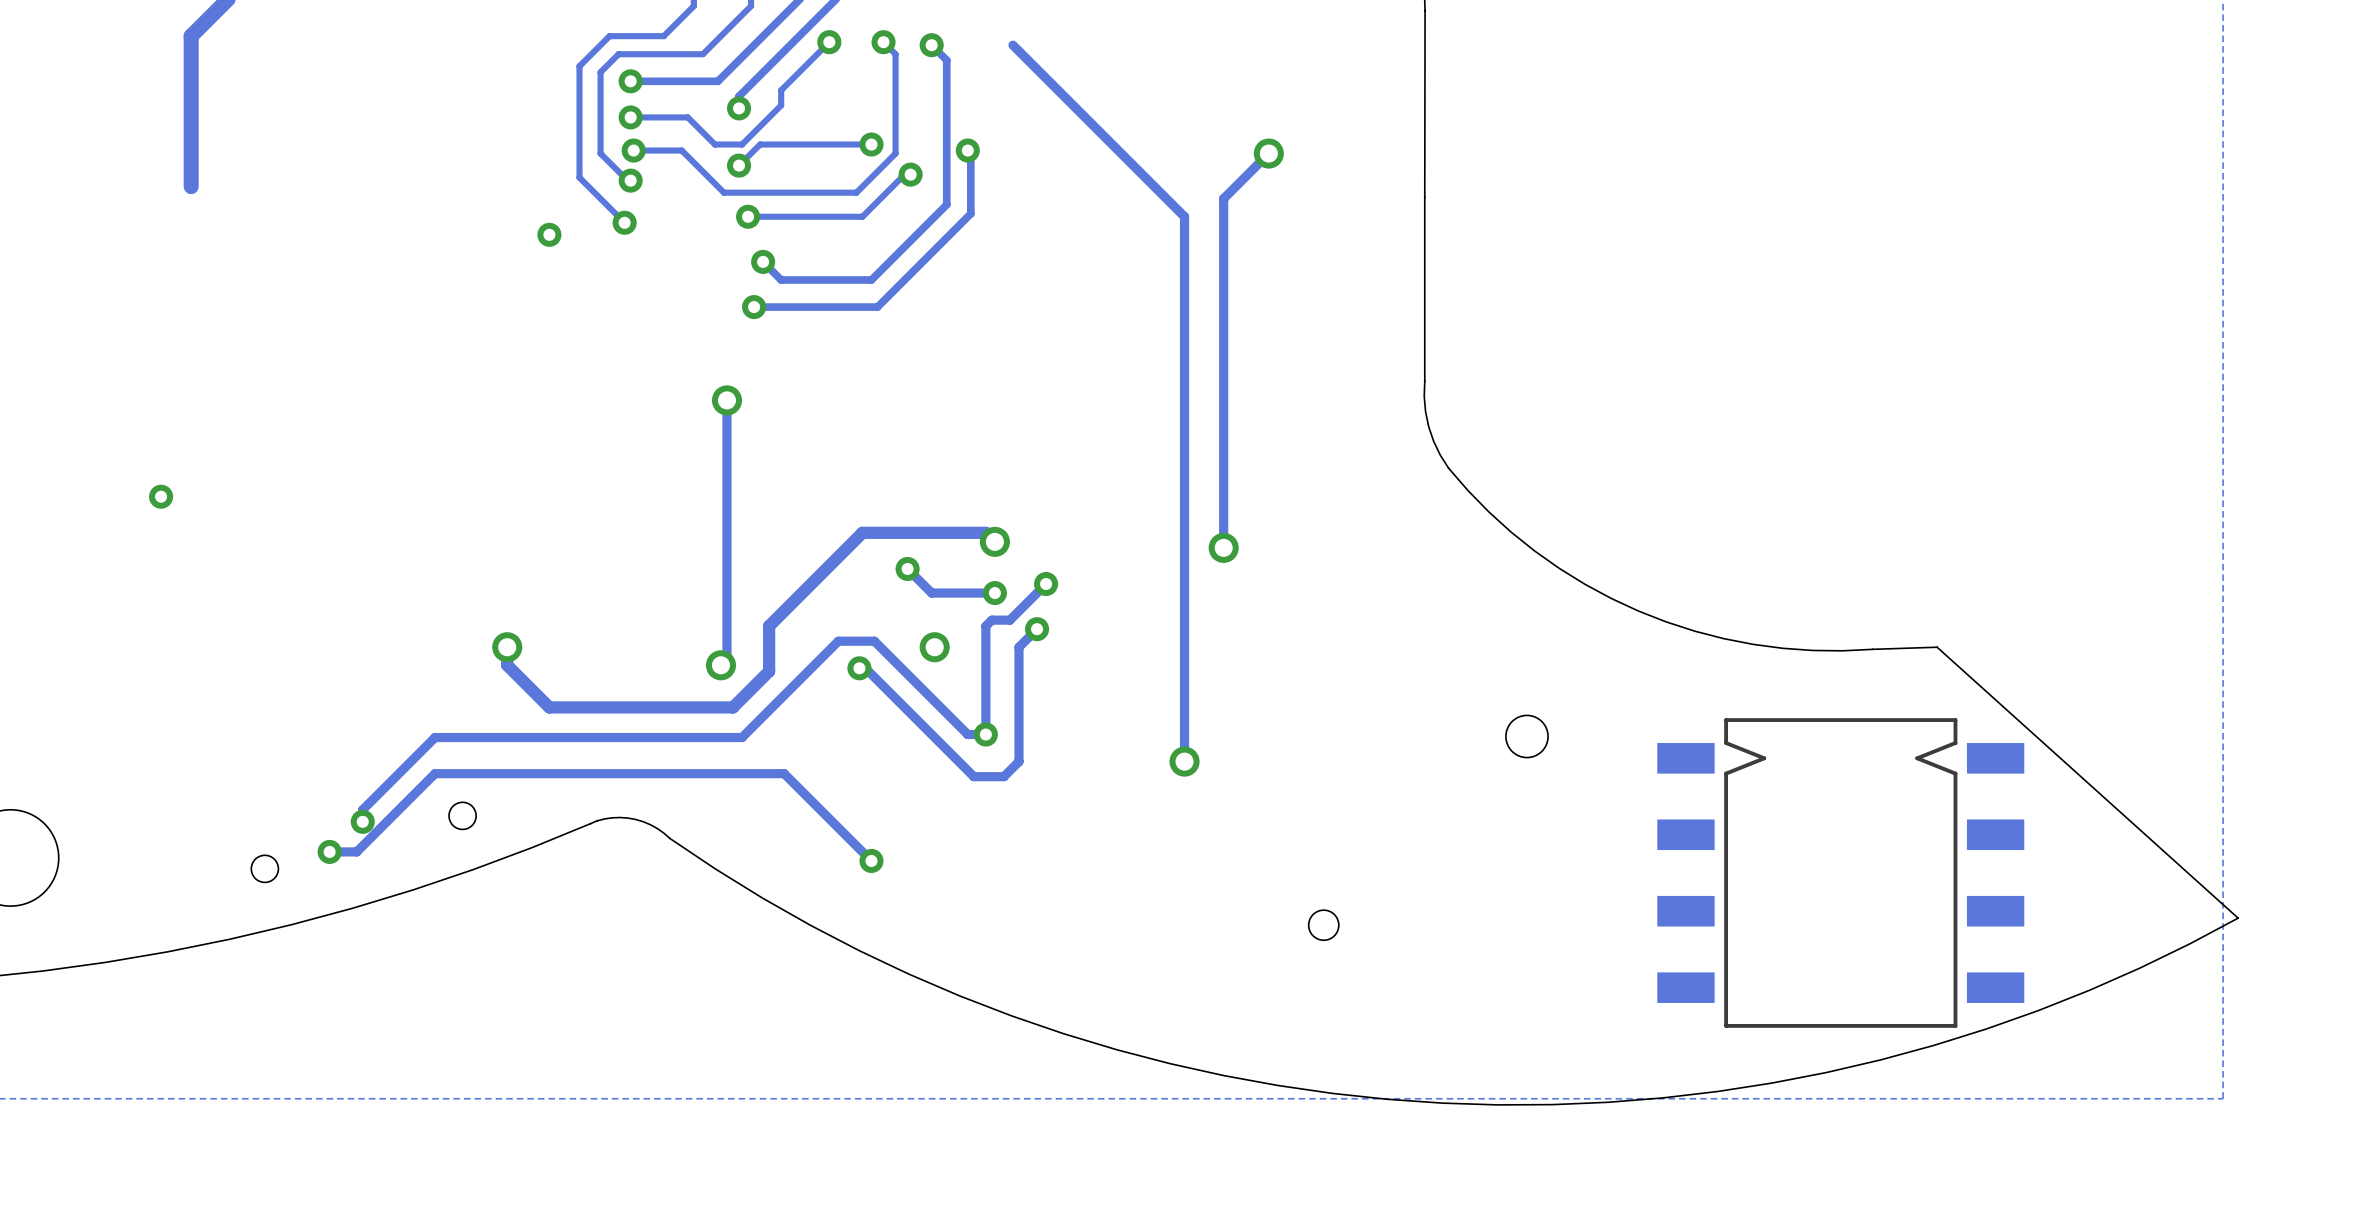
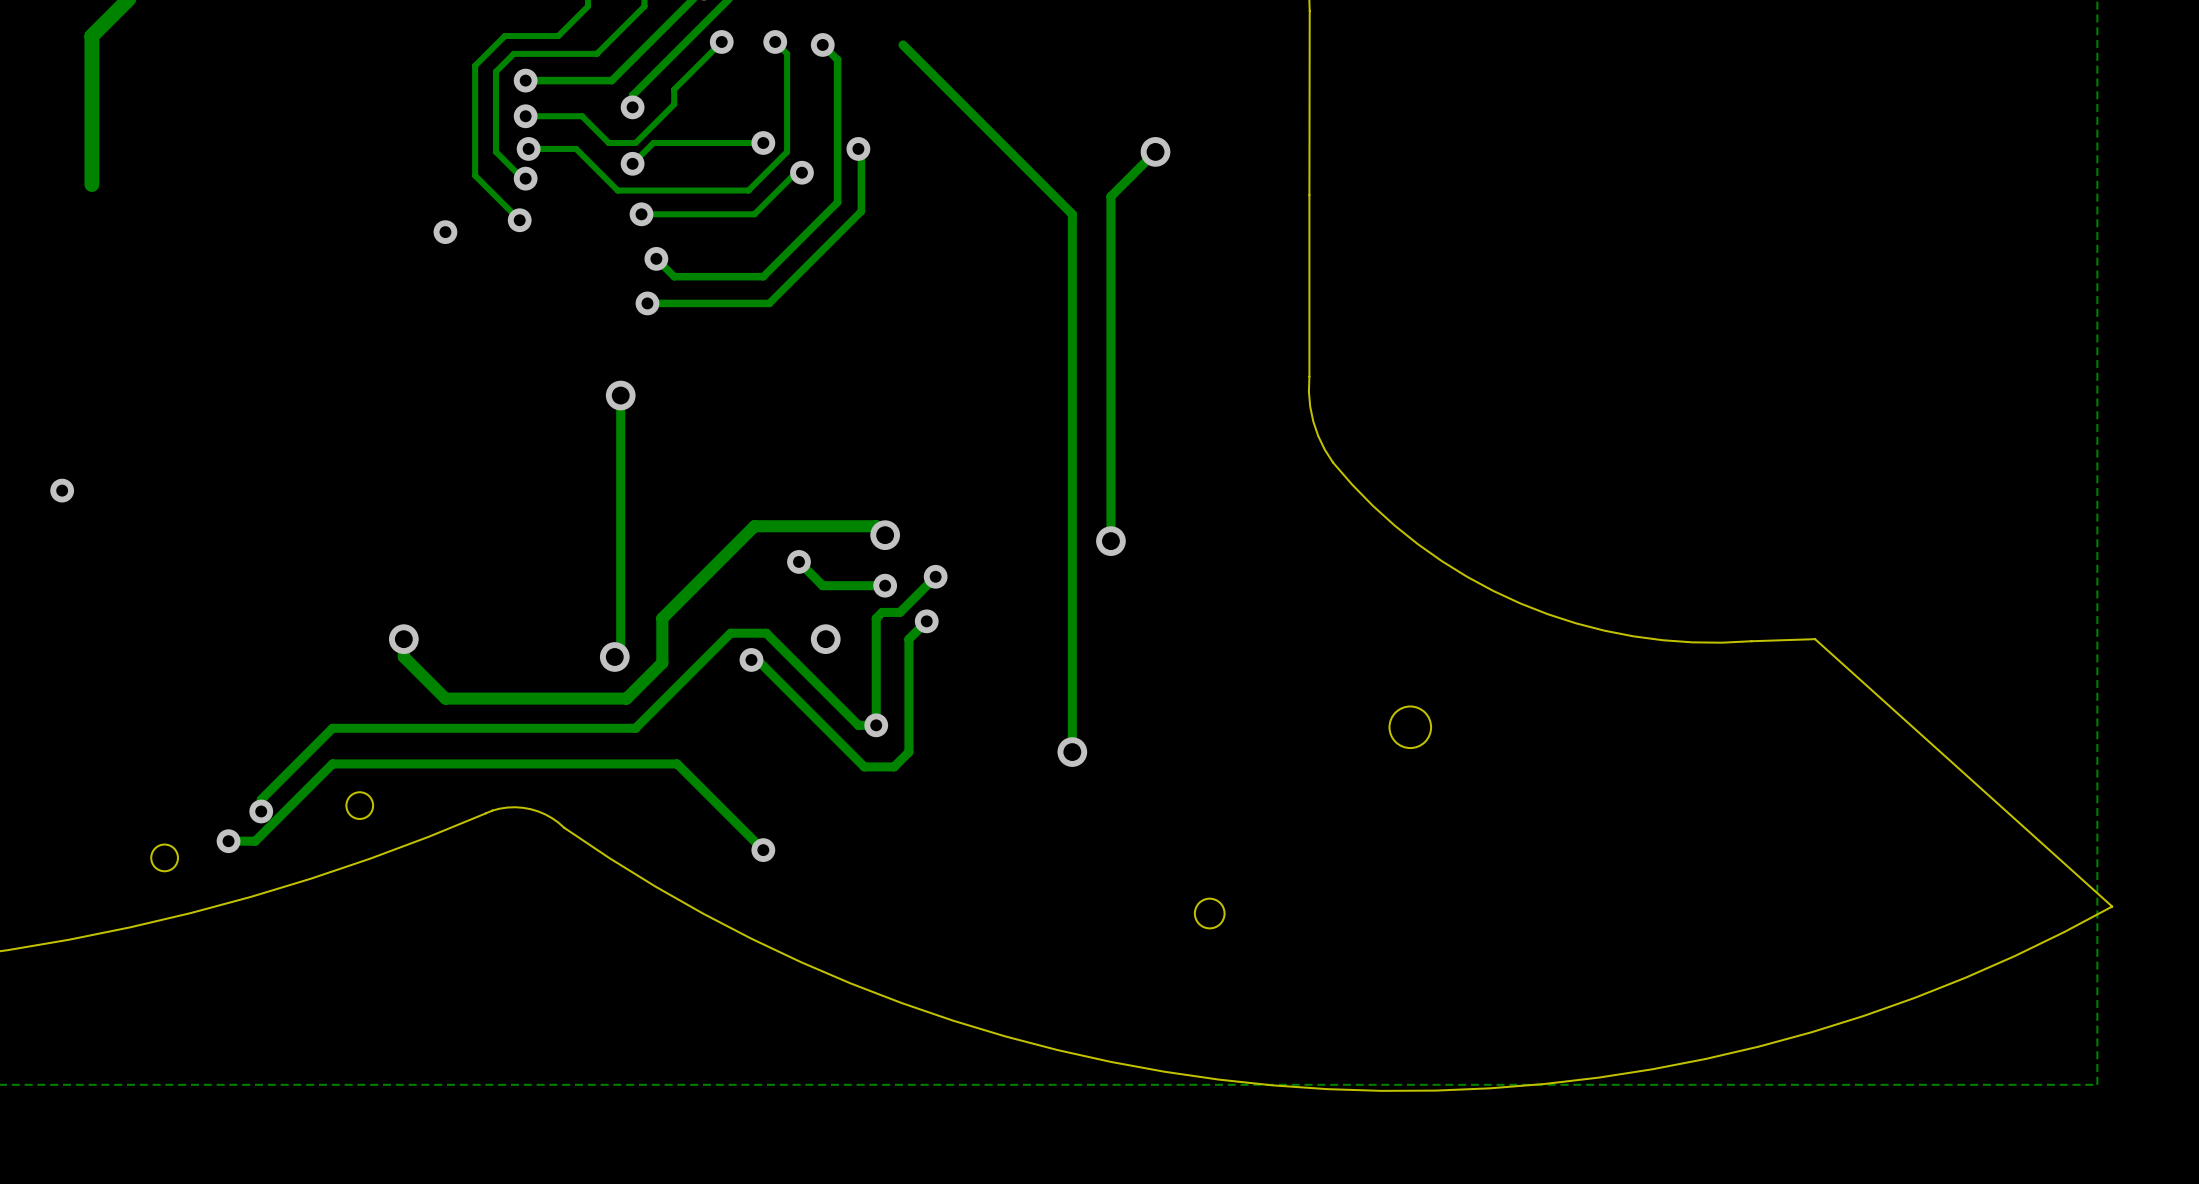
part: (1840, 873) -> none

